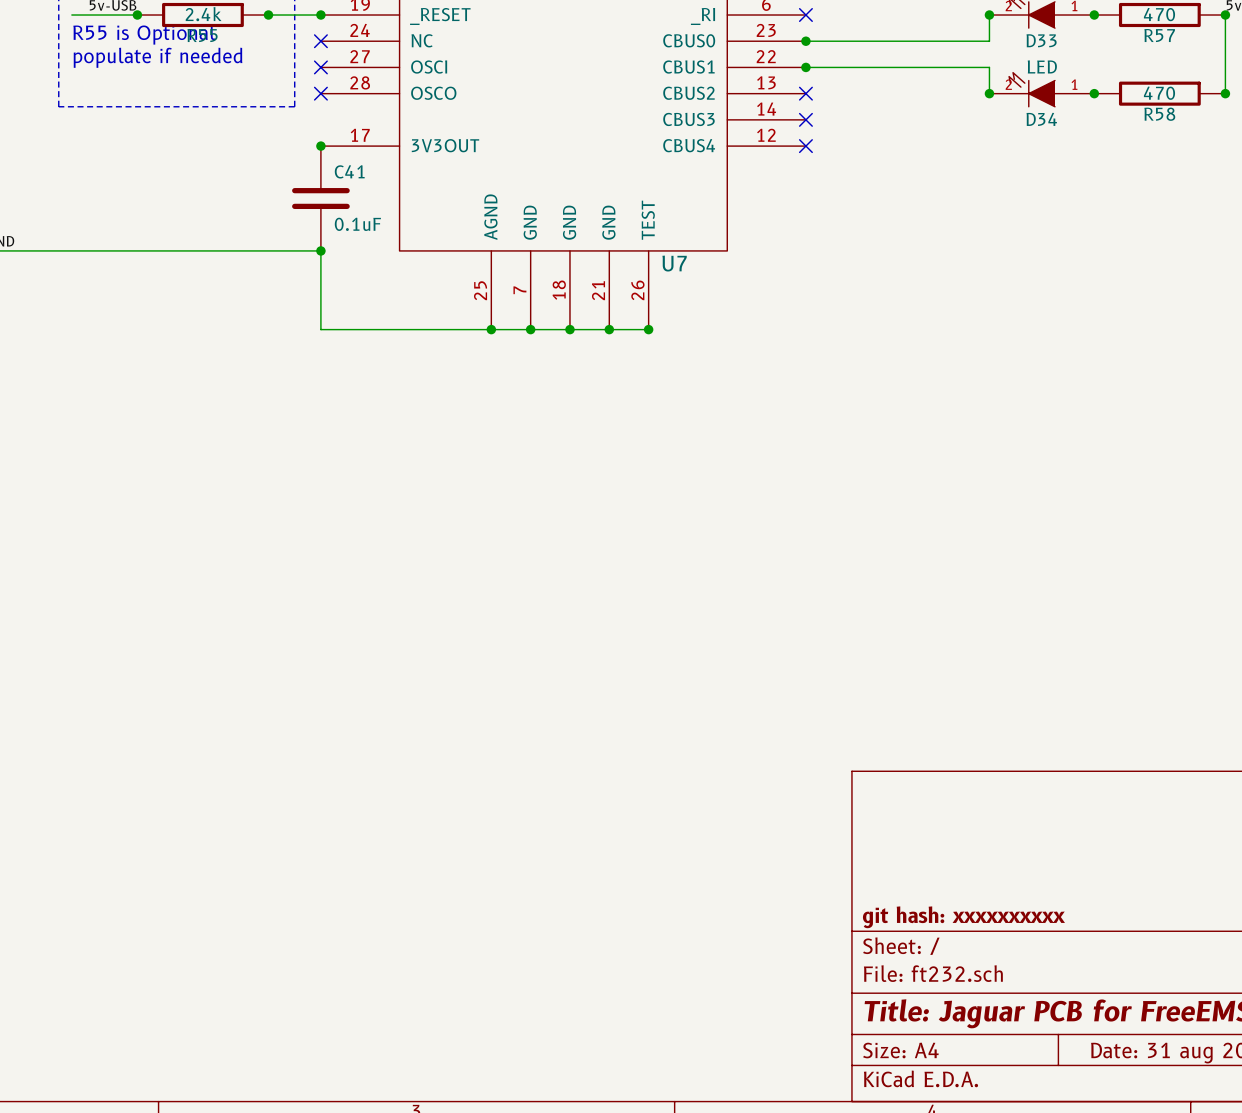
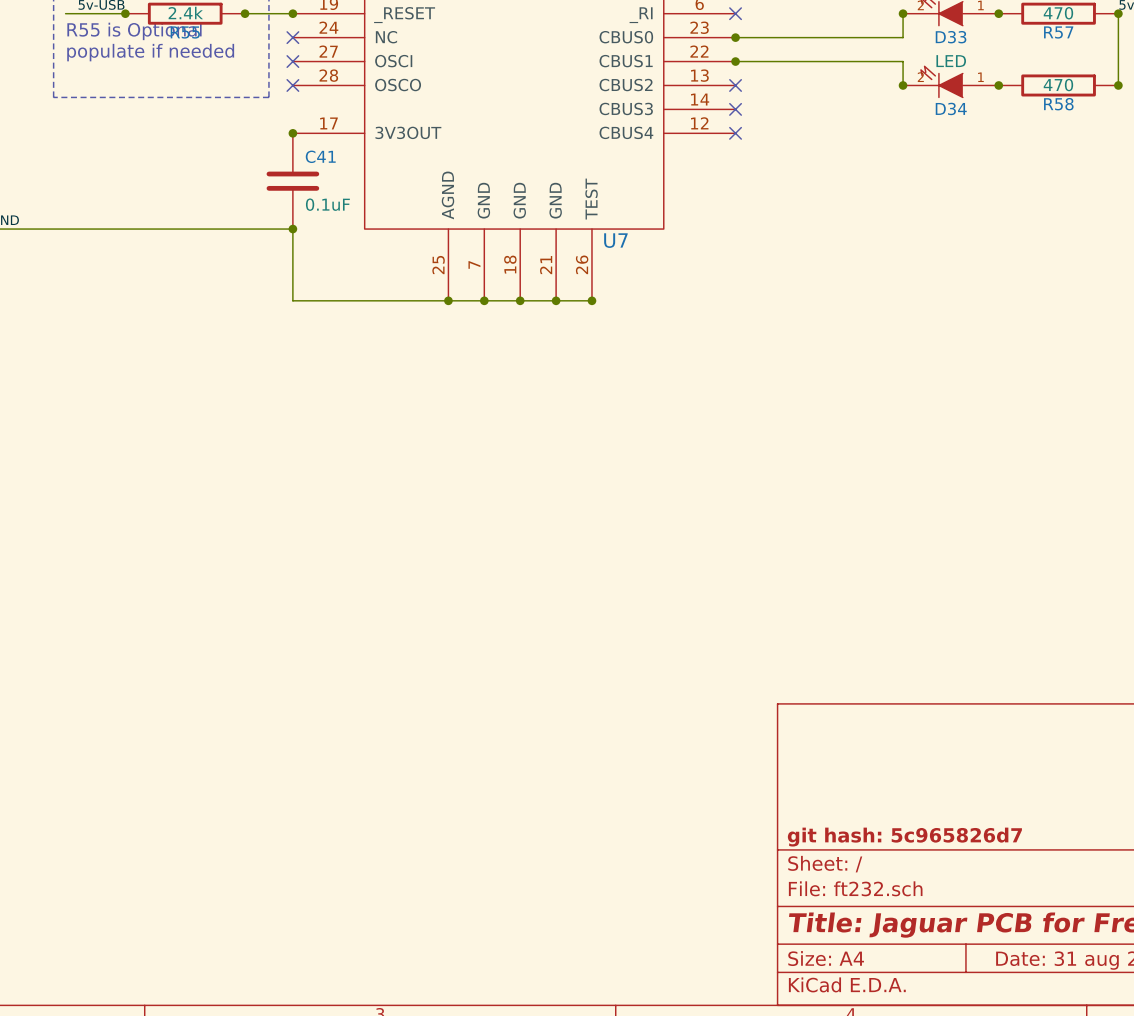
title block: git hash: xxxxxxxxxx (963, 917) -> git hash: 5c965826d7 (904, 837)

